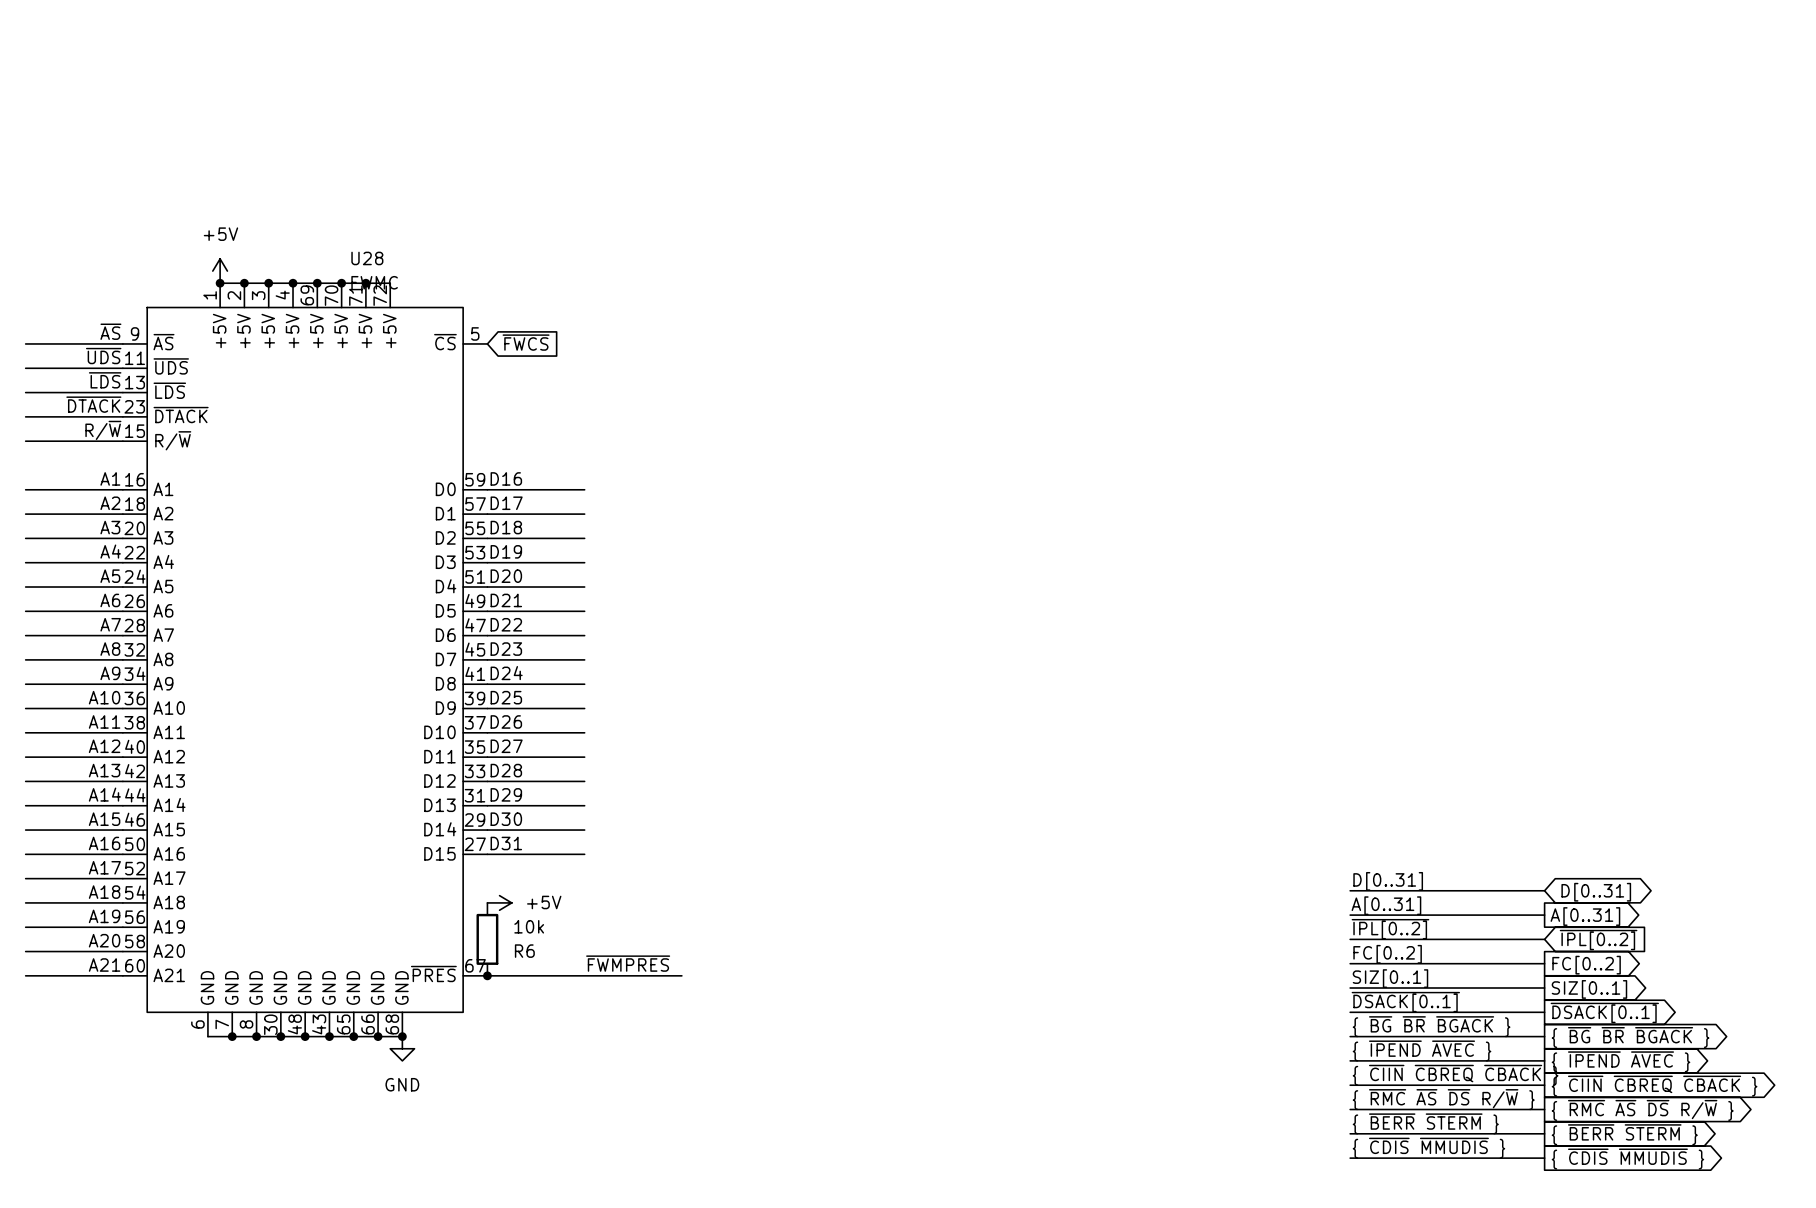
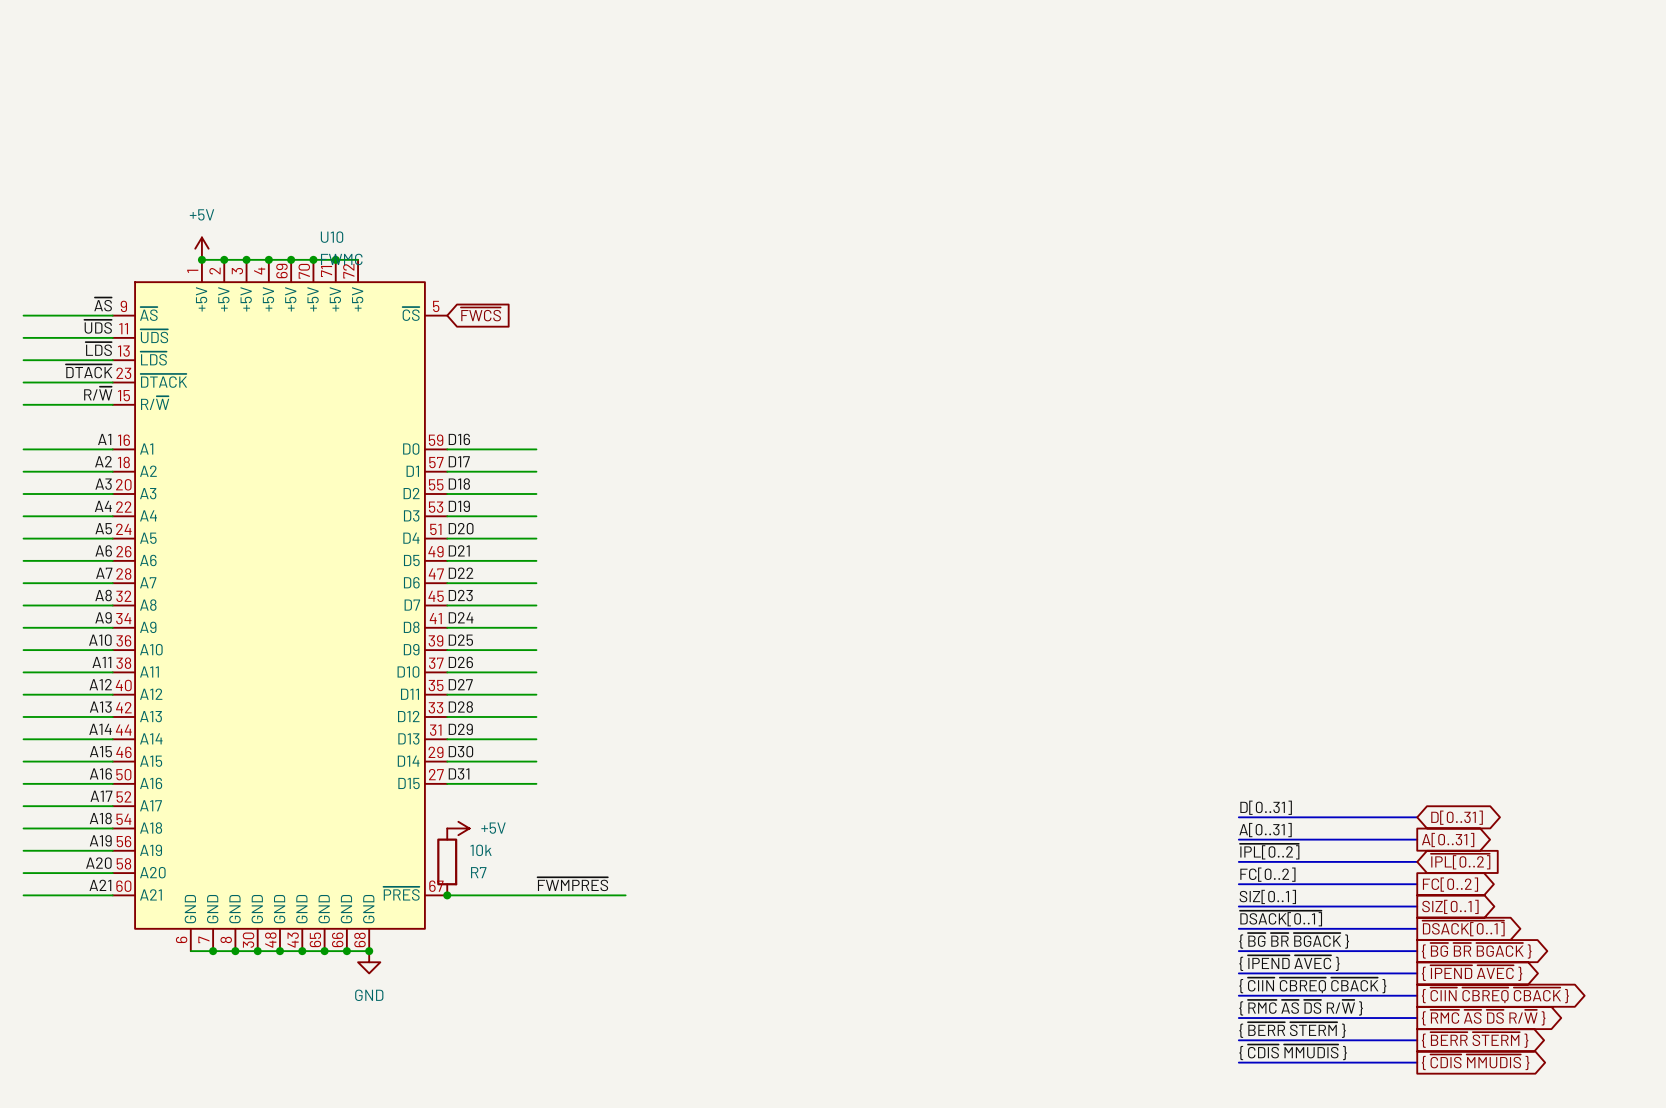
U28 name: U28 (367, 258) -> U10 (332, 237)
R6 name: R6 (524, 951) -> R7 (478, 872)

